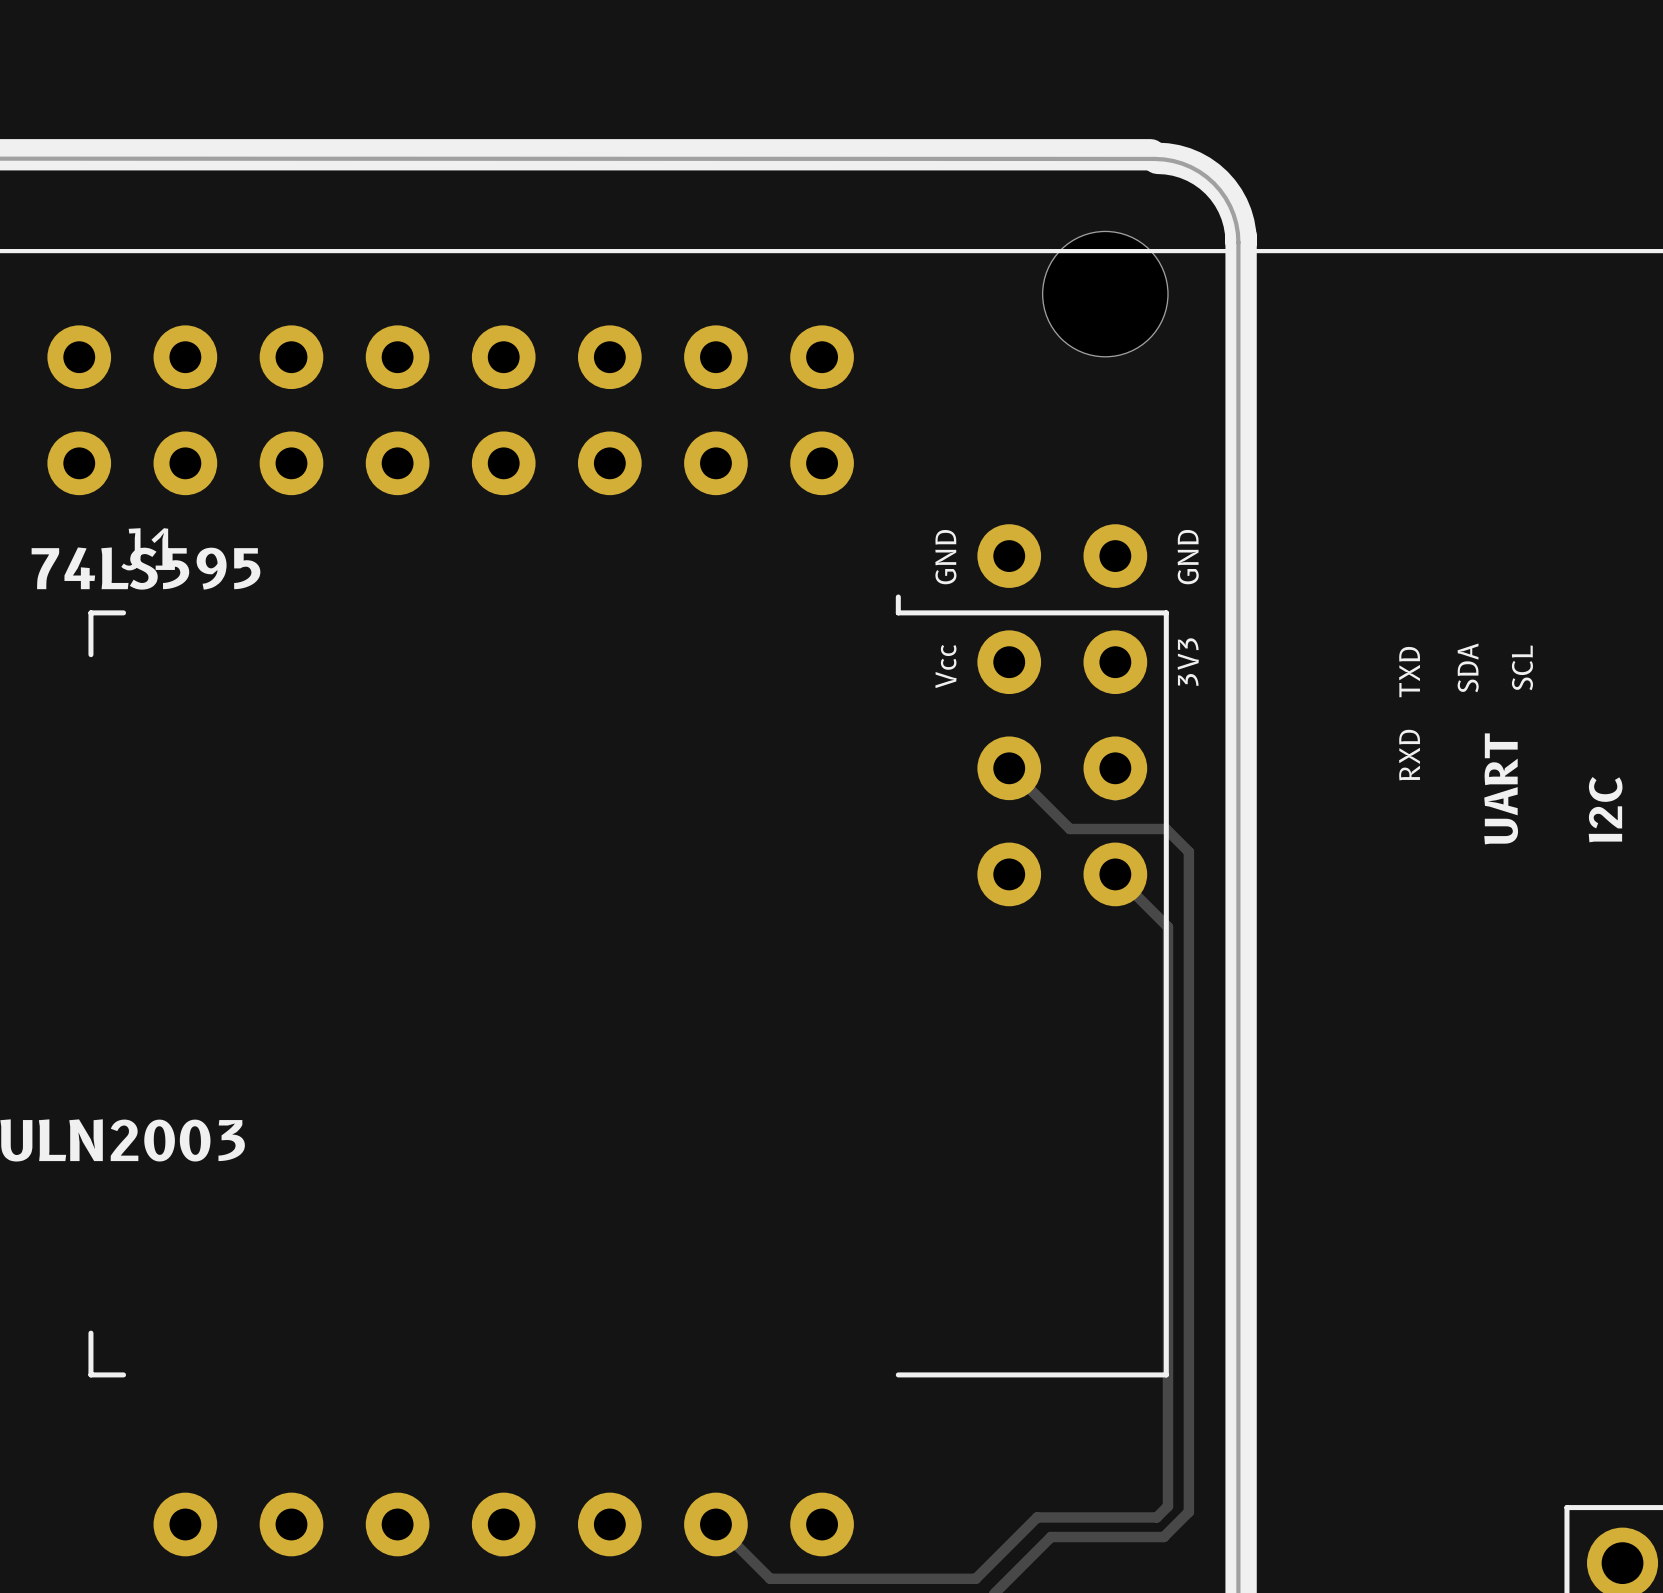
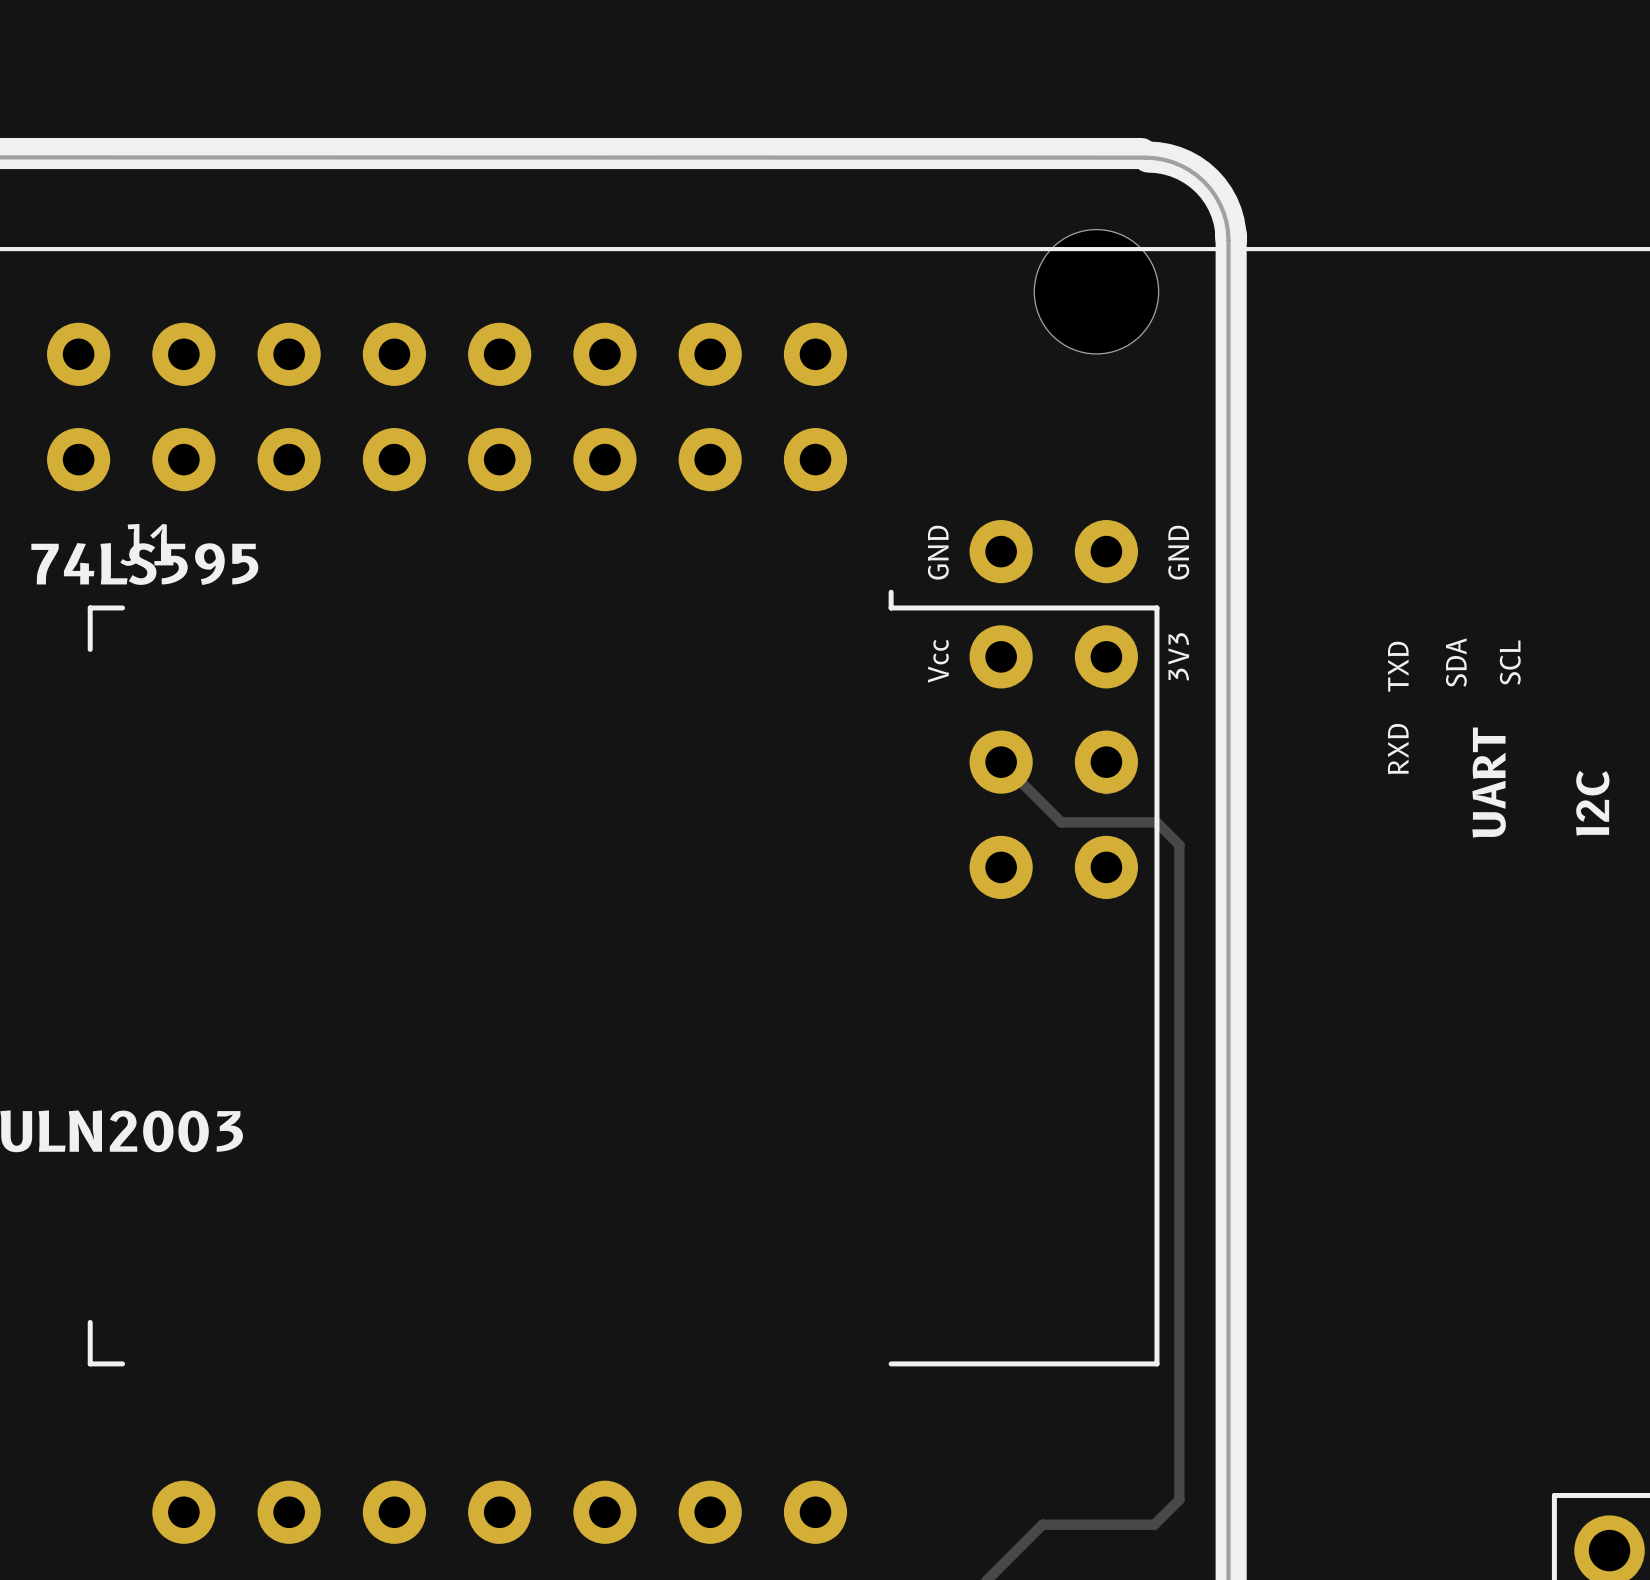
track: (1115, 874) (1167, 927) (1167, 1506) (1156, 1517) (1037, 1517) (975, 1578) (770, 1578) (715, 1524) -> none

